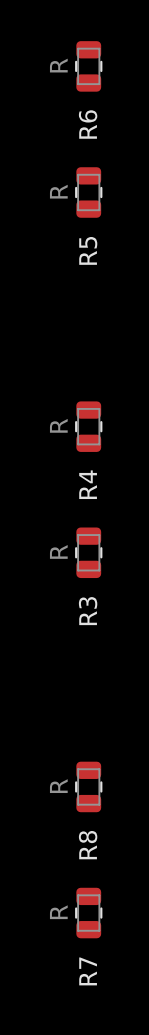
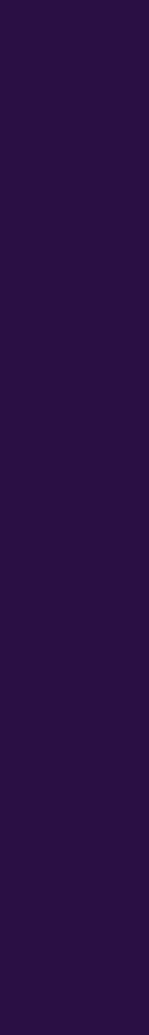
R6: R (88, 66) -> none
R5: R (88, 192) -> none
R4: R (88, 426) -> none
R3: R (88, 552) -> none
R8: R (88, 786) -> none
R7: R (88, 913) -> none

